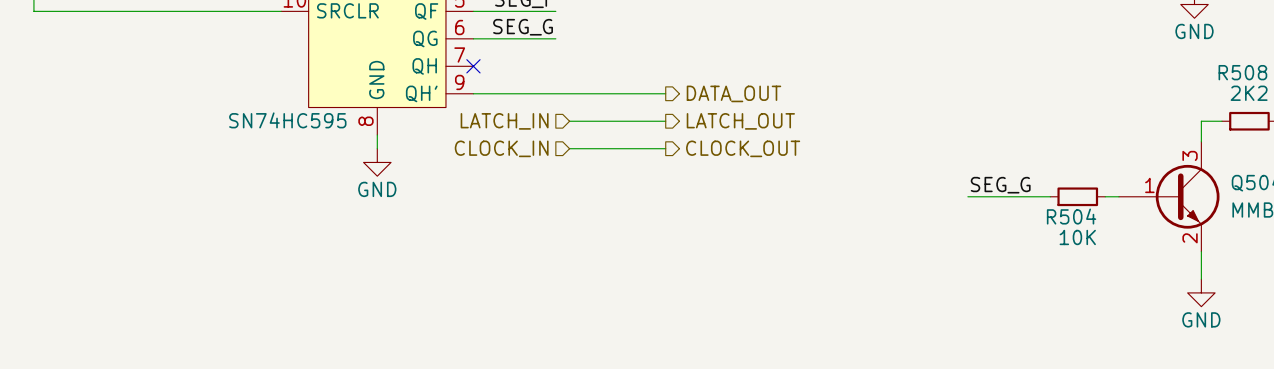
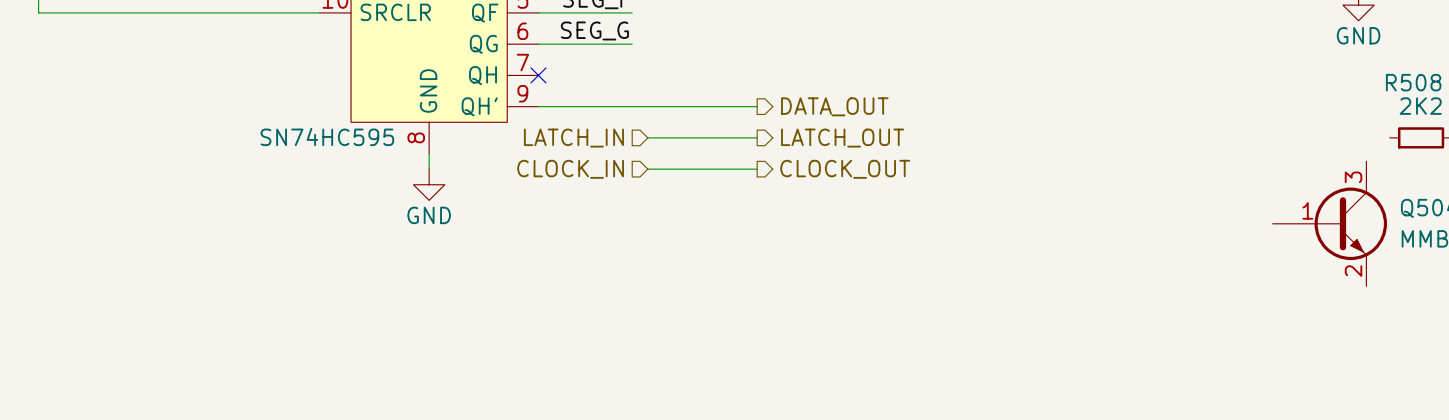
wire: (1221, 121) (1201, 121) (1201, 141) -> none
label: SEG_G (1000, 185) -> none
wire: (967, 196) (1050, 196) -> none
R504: 10K (1077, 196) -> none
wire: (1105, 196) (1118, 196) -> none
wire: (1201, 251) (1201, 279) -> none
power symbol: GND (1201, 292) -> none

